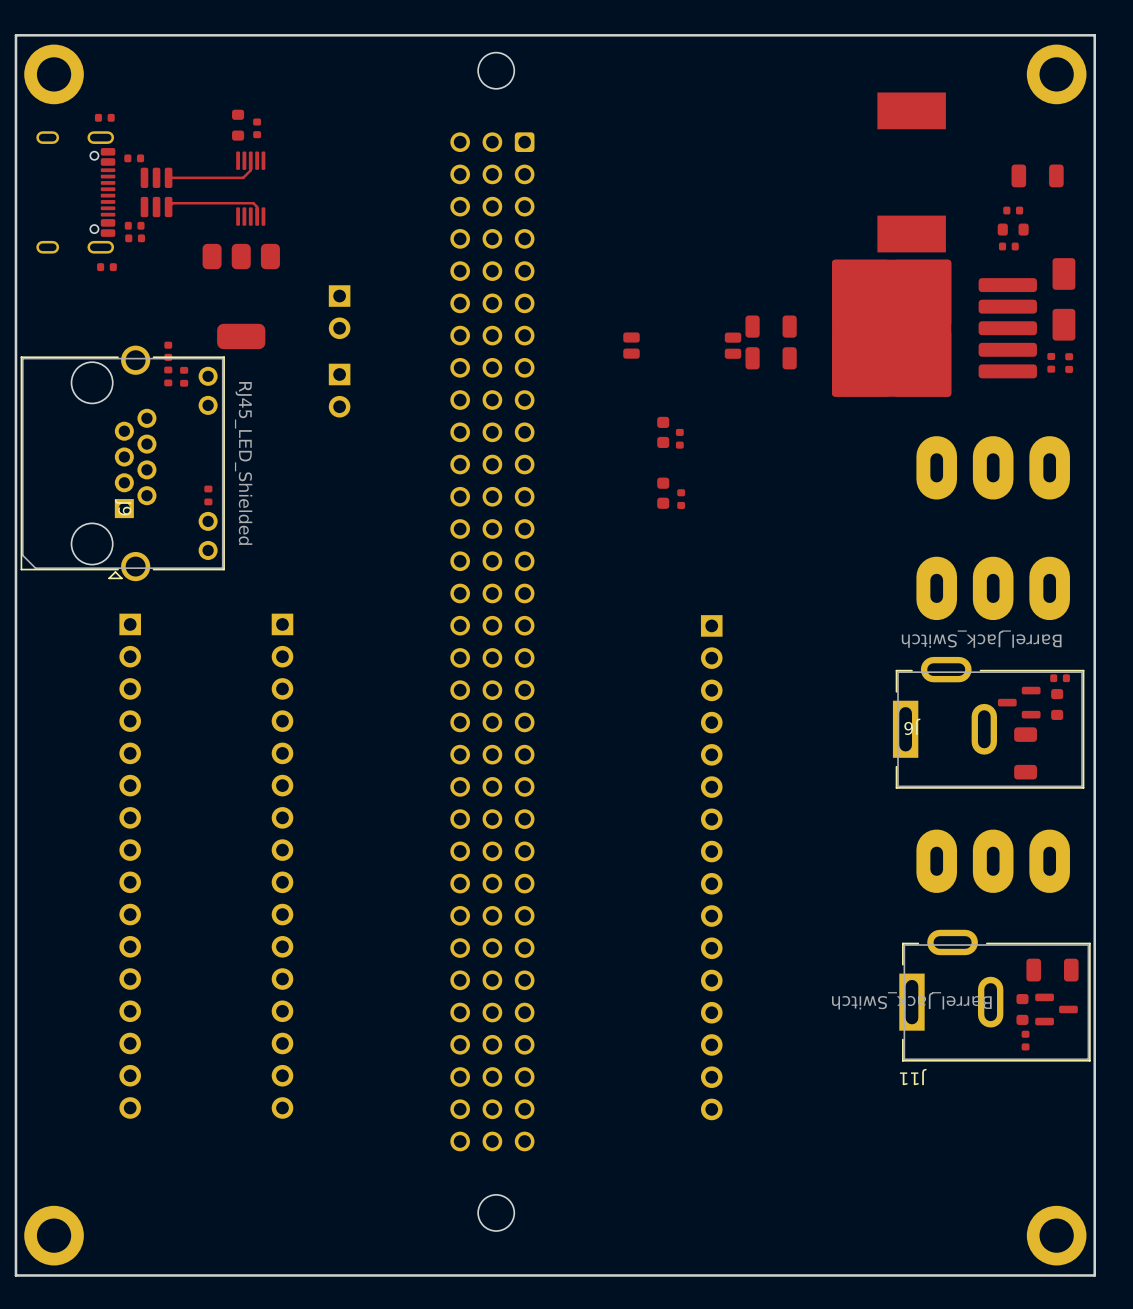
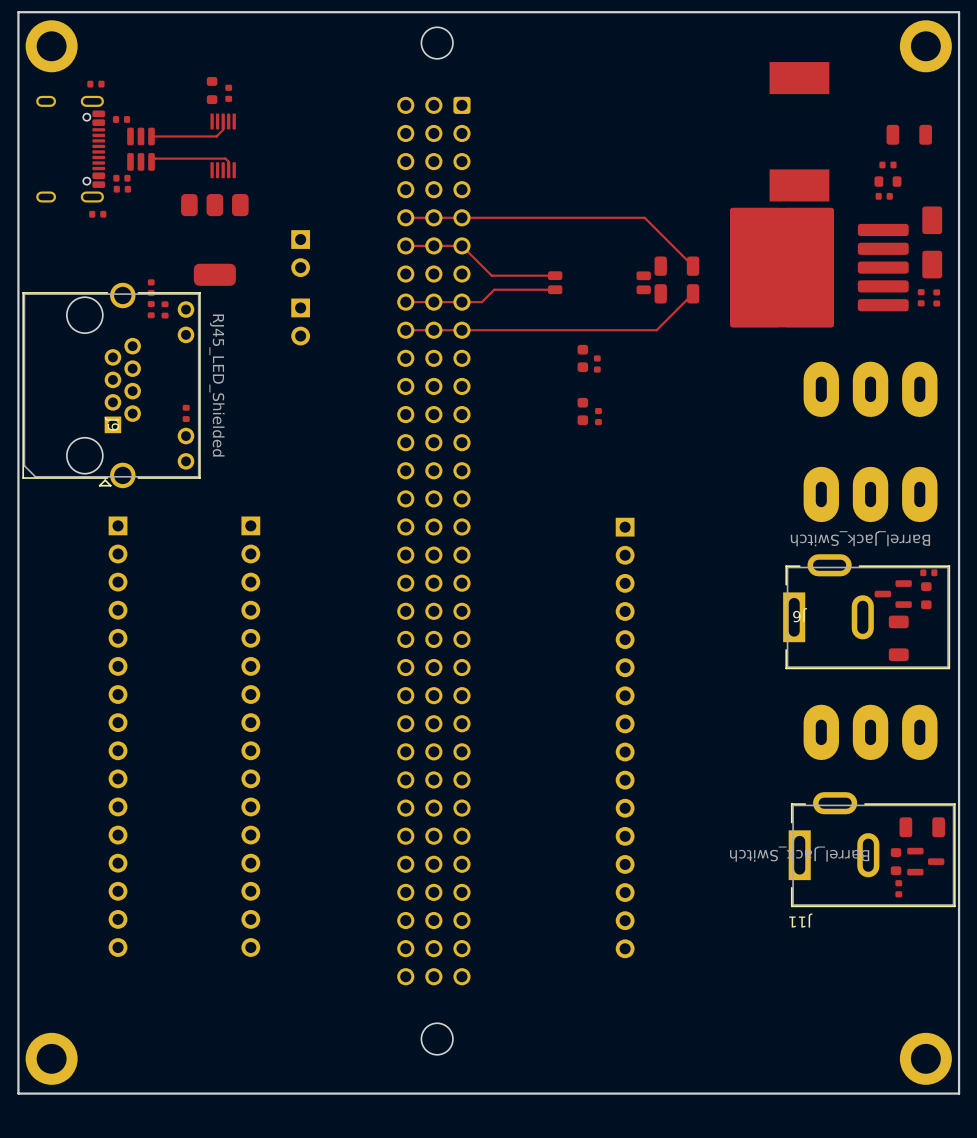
top track: none -> (405, 217) (644, 217) (693, 266)
top track: none -> (405, 245) (461, 245) (491, 275) (555, 275)
top track: none -> (555, 289) (494, 289) (481, 302) (405, 302)
top track: none -> (693, 293) (656, 330) (405, 330)

